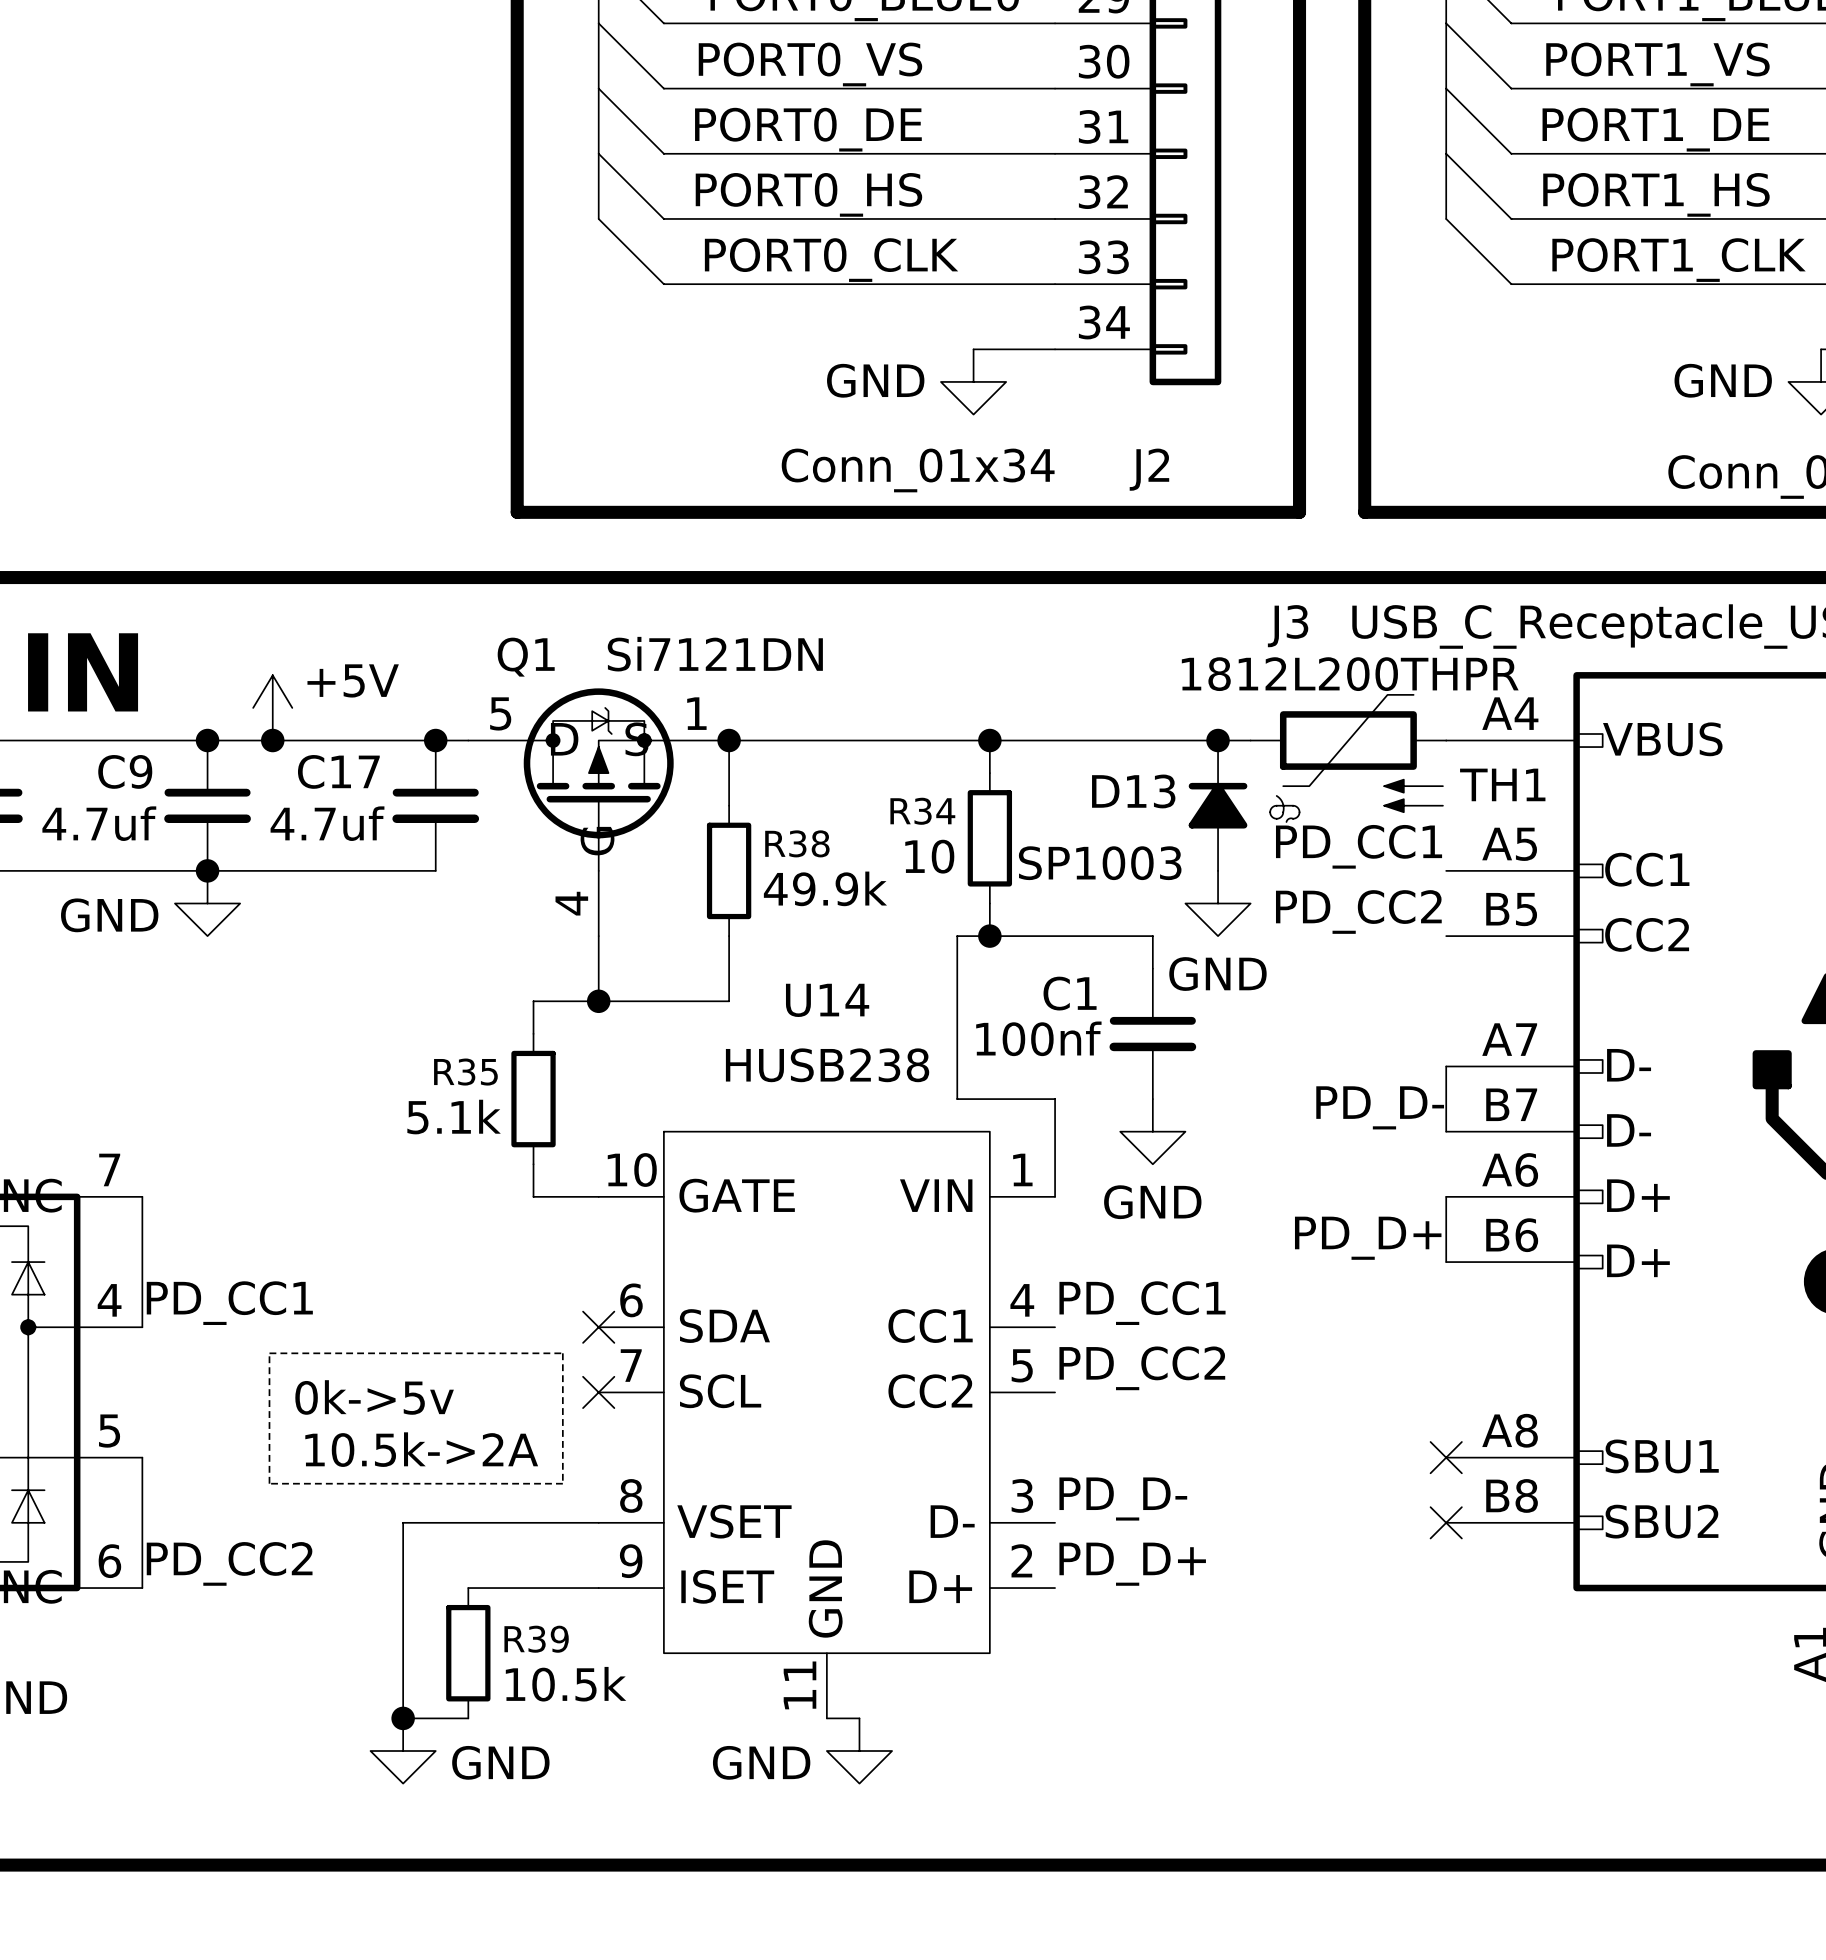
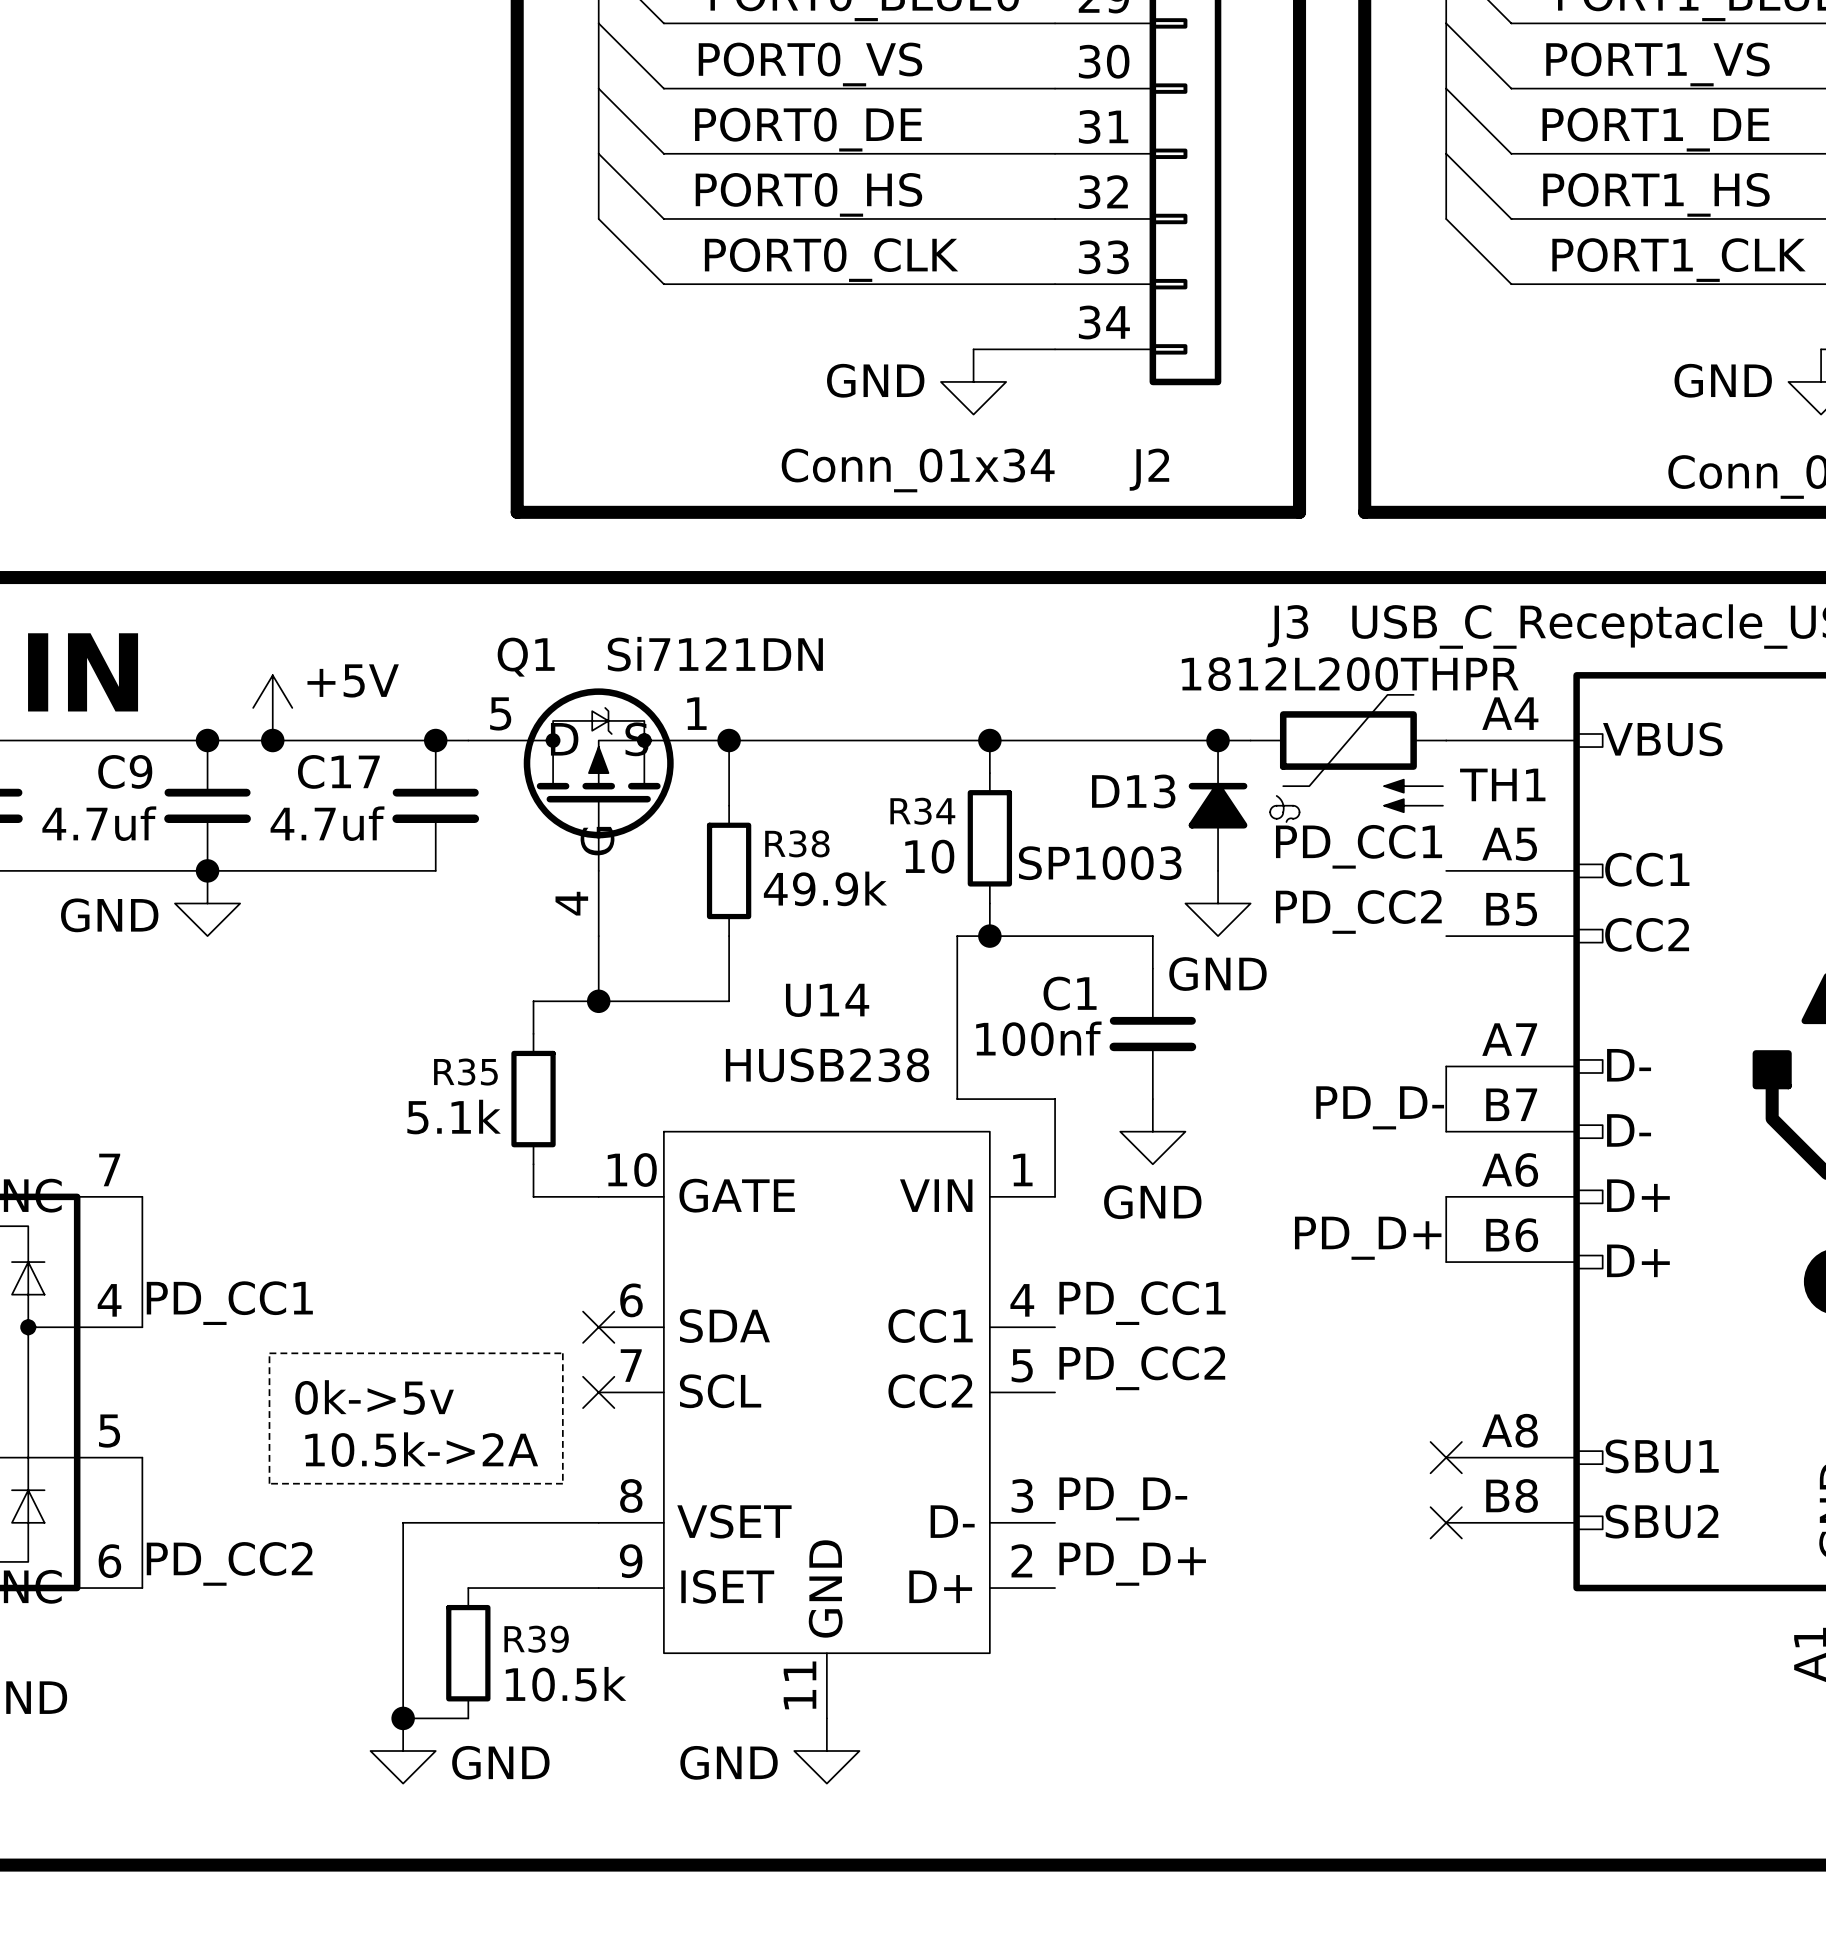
wire: (826, 1718) (859, 1718) -> none
power symbol position: GND (859, 1751) -> GND (826, 1751)

